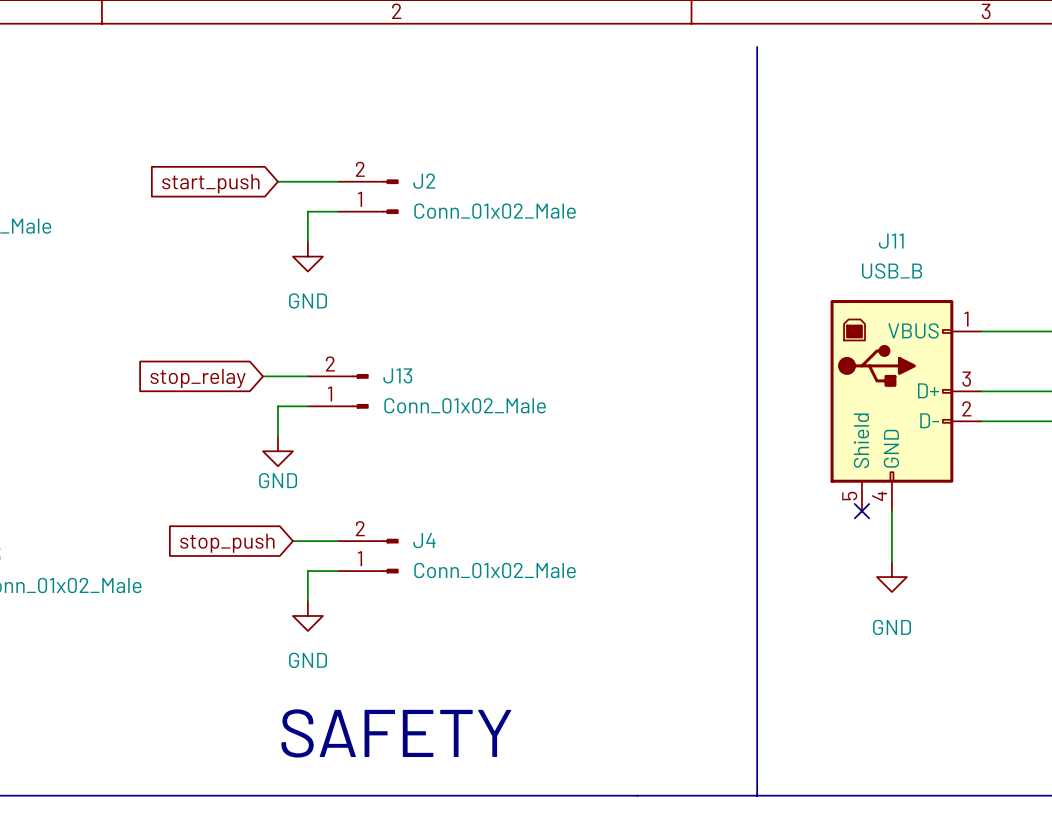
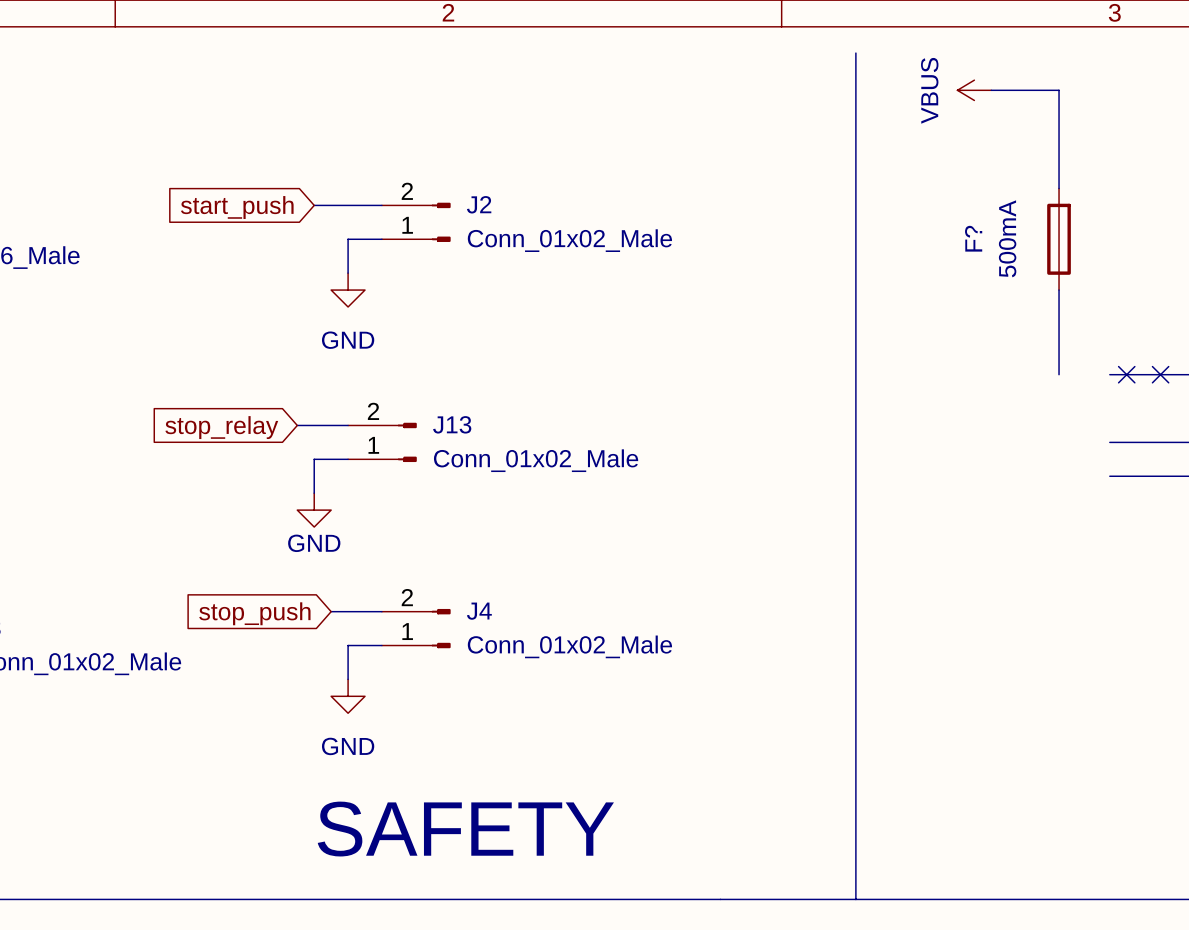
power symbol: none -> VBUS (974, 90)
wire: none -> (991, 90) (1059, 90) (1059, 188)
F?: none -> 500mA (1059, 239)
wire: none -> (1059, 290) (1059, 374)
no-connect mark: none -> (1126, 374)
no-connect mark: none -> (1160, 374)
J11: USB_B (906, 405) -> none
no-connect mark: (861, 511) -> none
wire: (891, 511) (891, 562) -> none
power symbol: GND (891, 577) -> none

